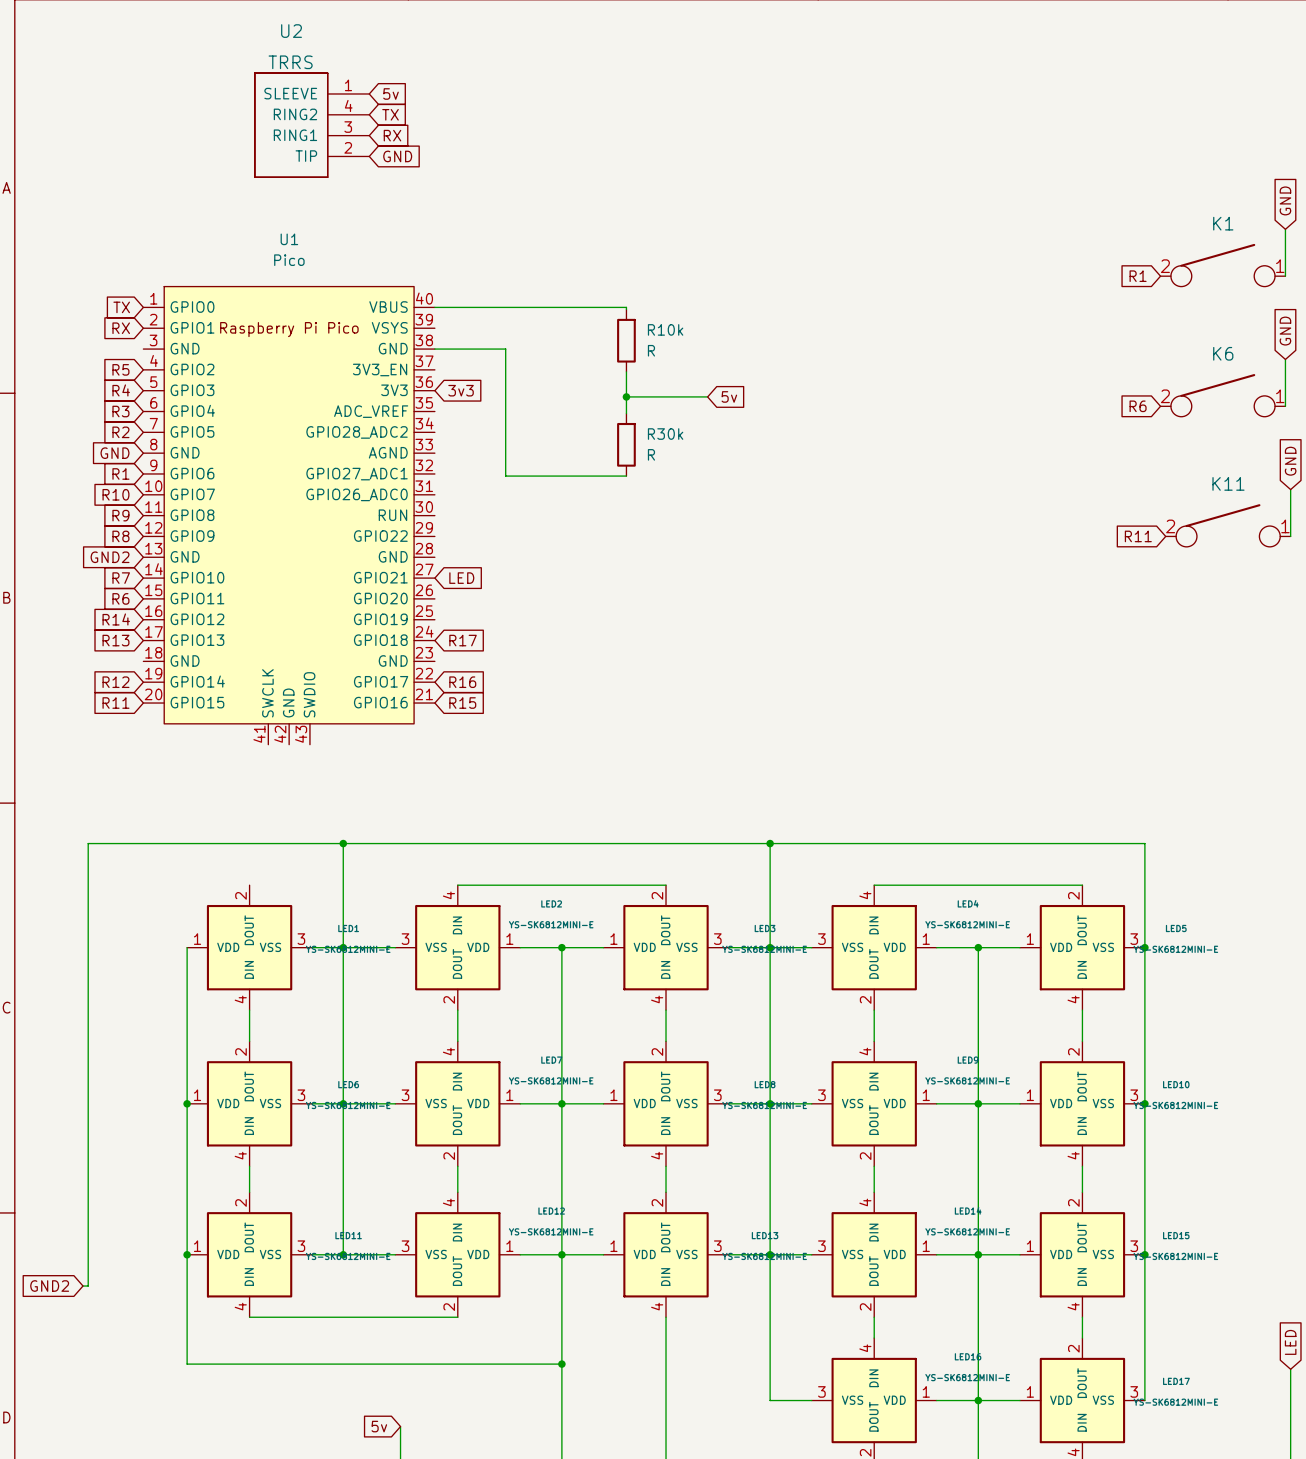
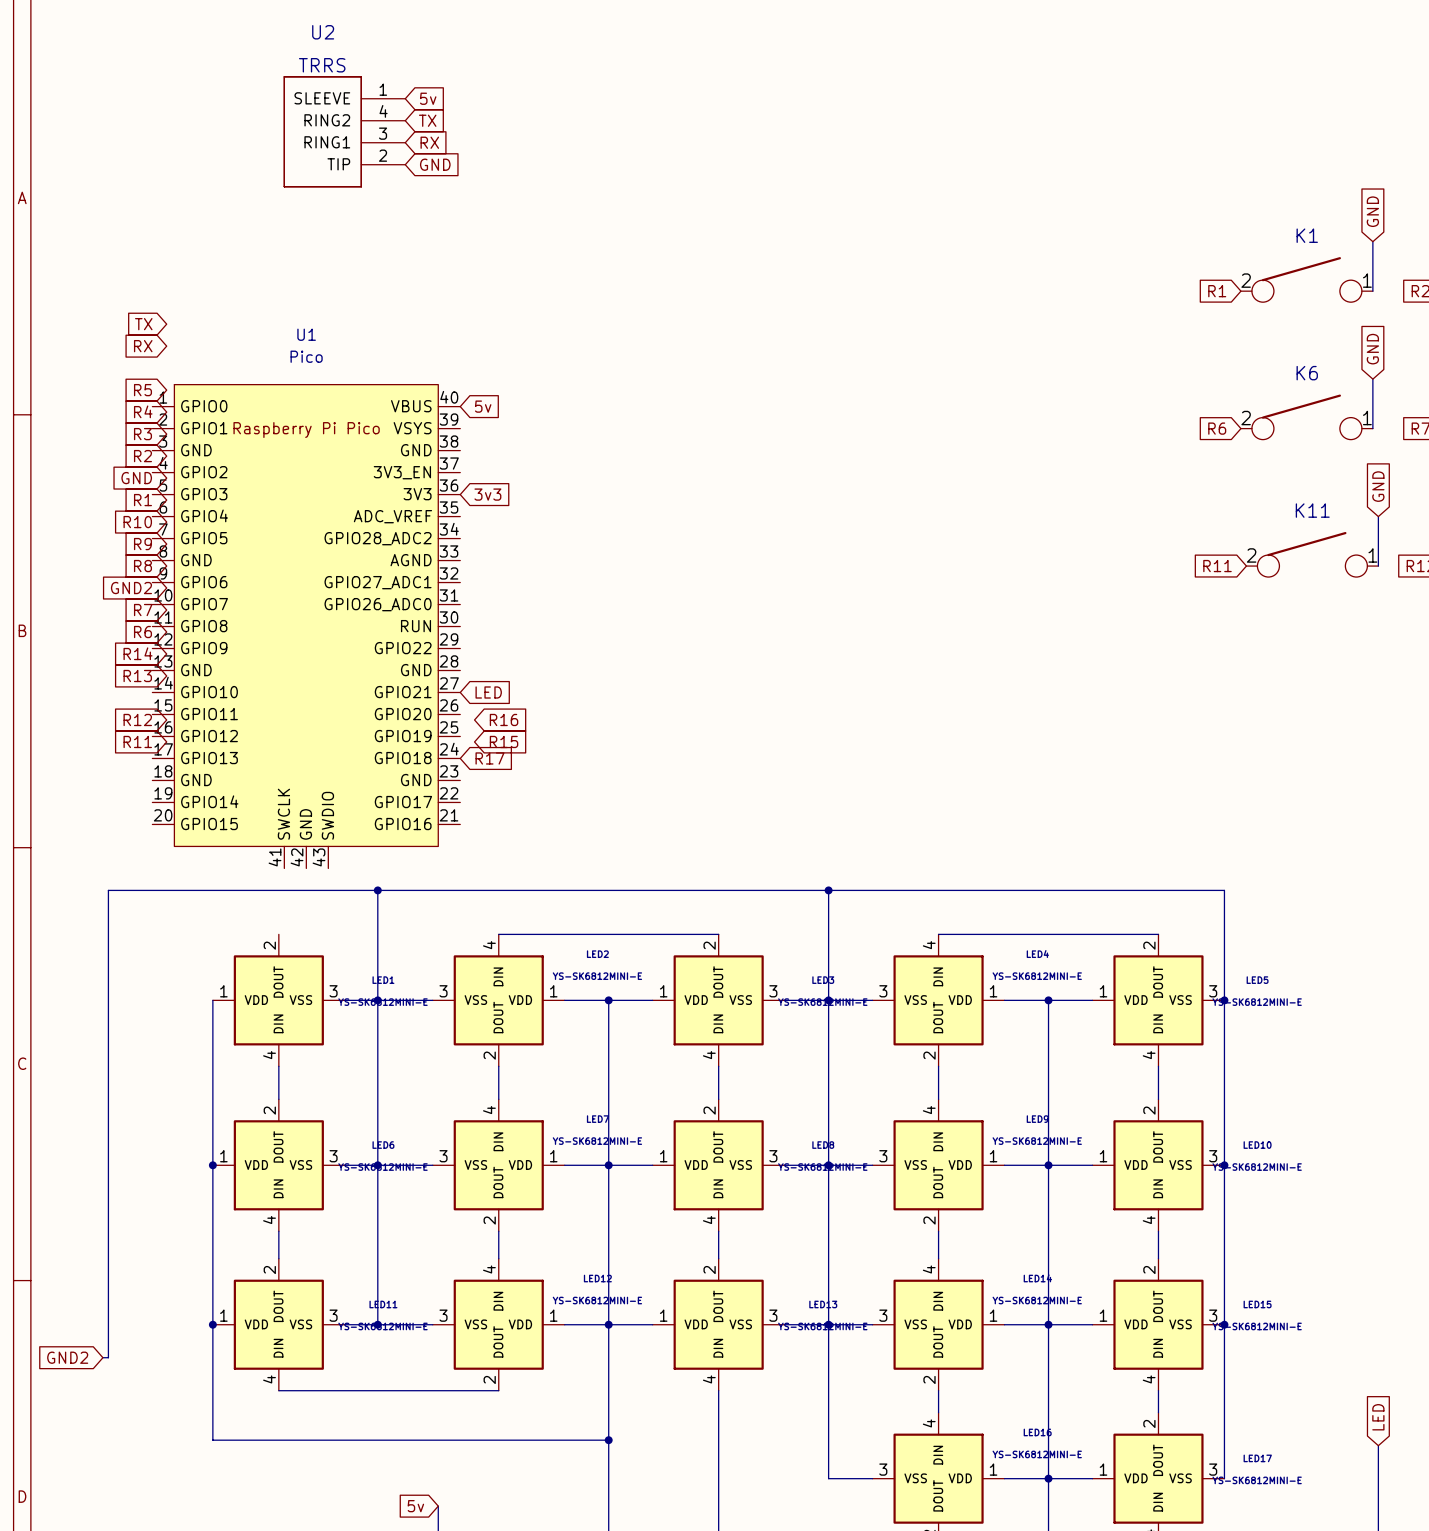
wire: (434, 307) (626, 307) (626, 309) -> none
R10k: R (626, 340) -> none
wire: (434, 349) (505, 349) (505, 476) (626, 476) -> none
wire: (626, 371) (626, 413) -> none
global label: none -> 5v (483, 406)
global label position: 3v3 (461, 390) -> 3v3 (487, 494)
wire: (626, 396) (707, 396) -> none
junction: (626, 396) -> none
global label: 5v (729, 396) -> none
R30k: R (626, 444) -> none
U1 position: (289, 515) -> (306, 626)
global label position: LED (461, 578) -> LED (488, 692)
global label position: R17 (463, 640) -> R17 (490, 758)

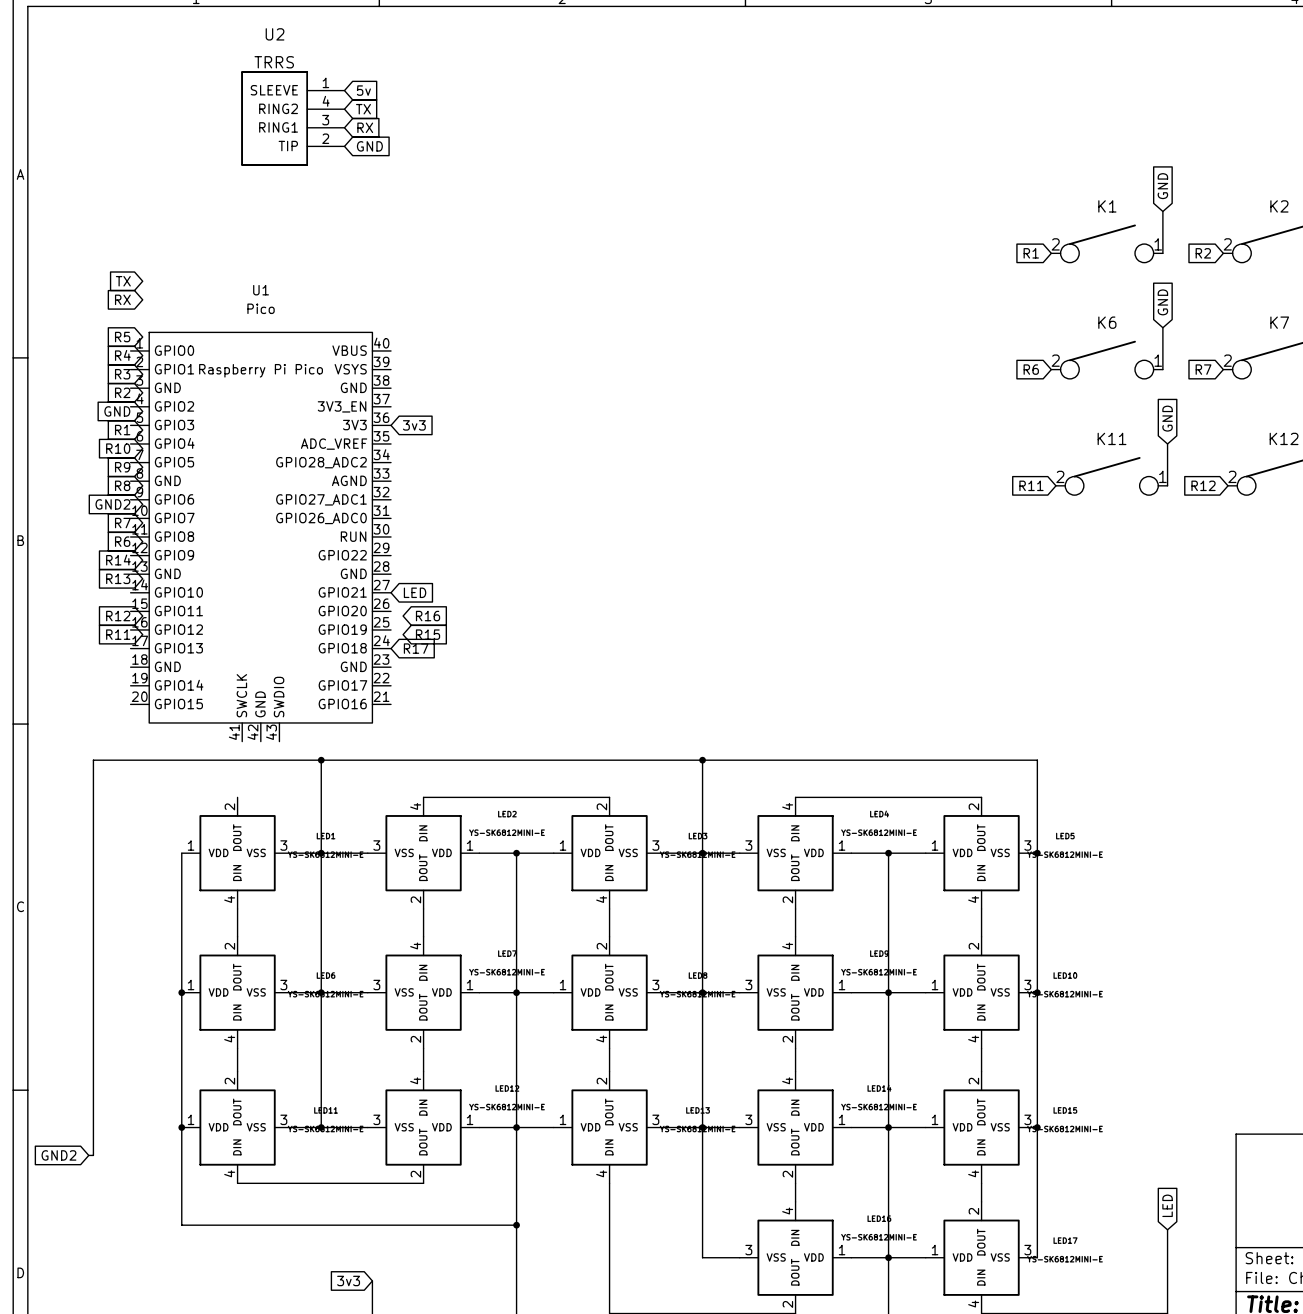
global label: 5v (483, 406) -> none
global label: 5v (415, 1506) -> 3v3 (348, 1280)

